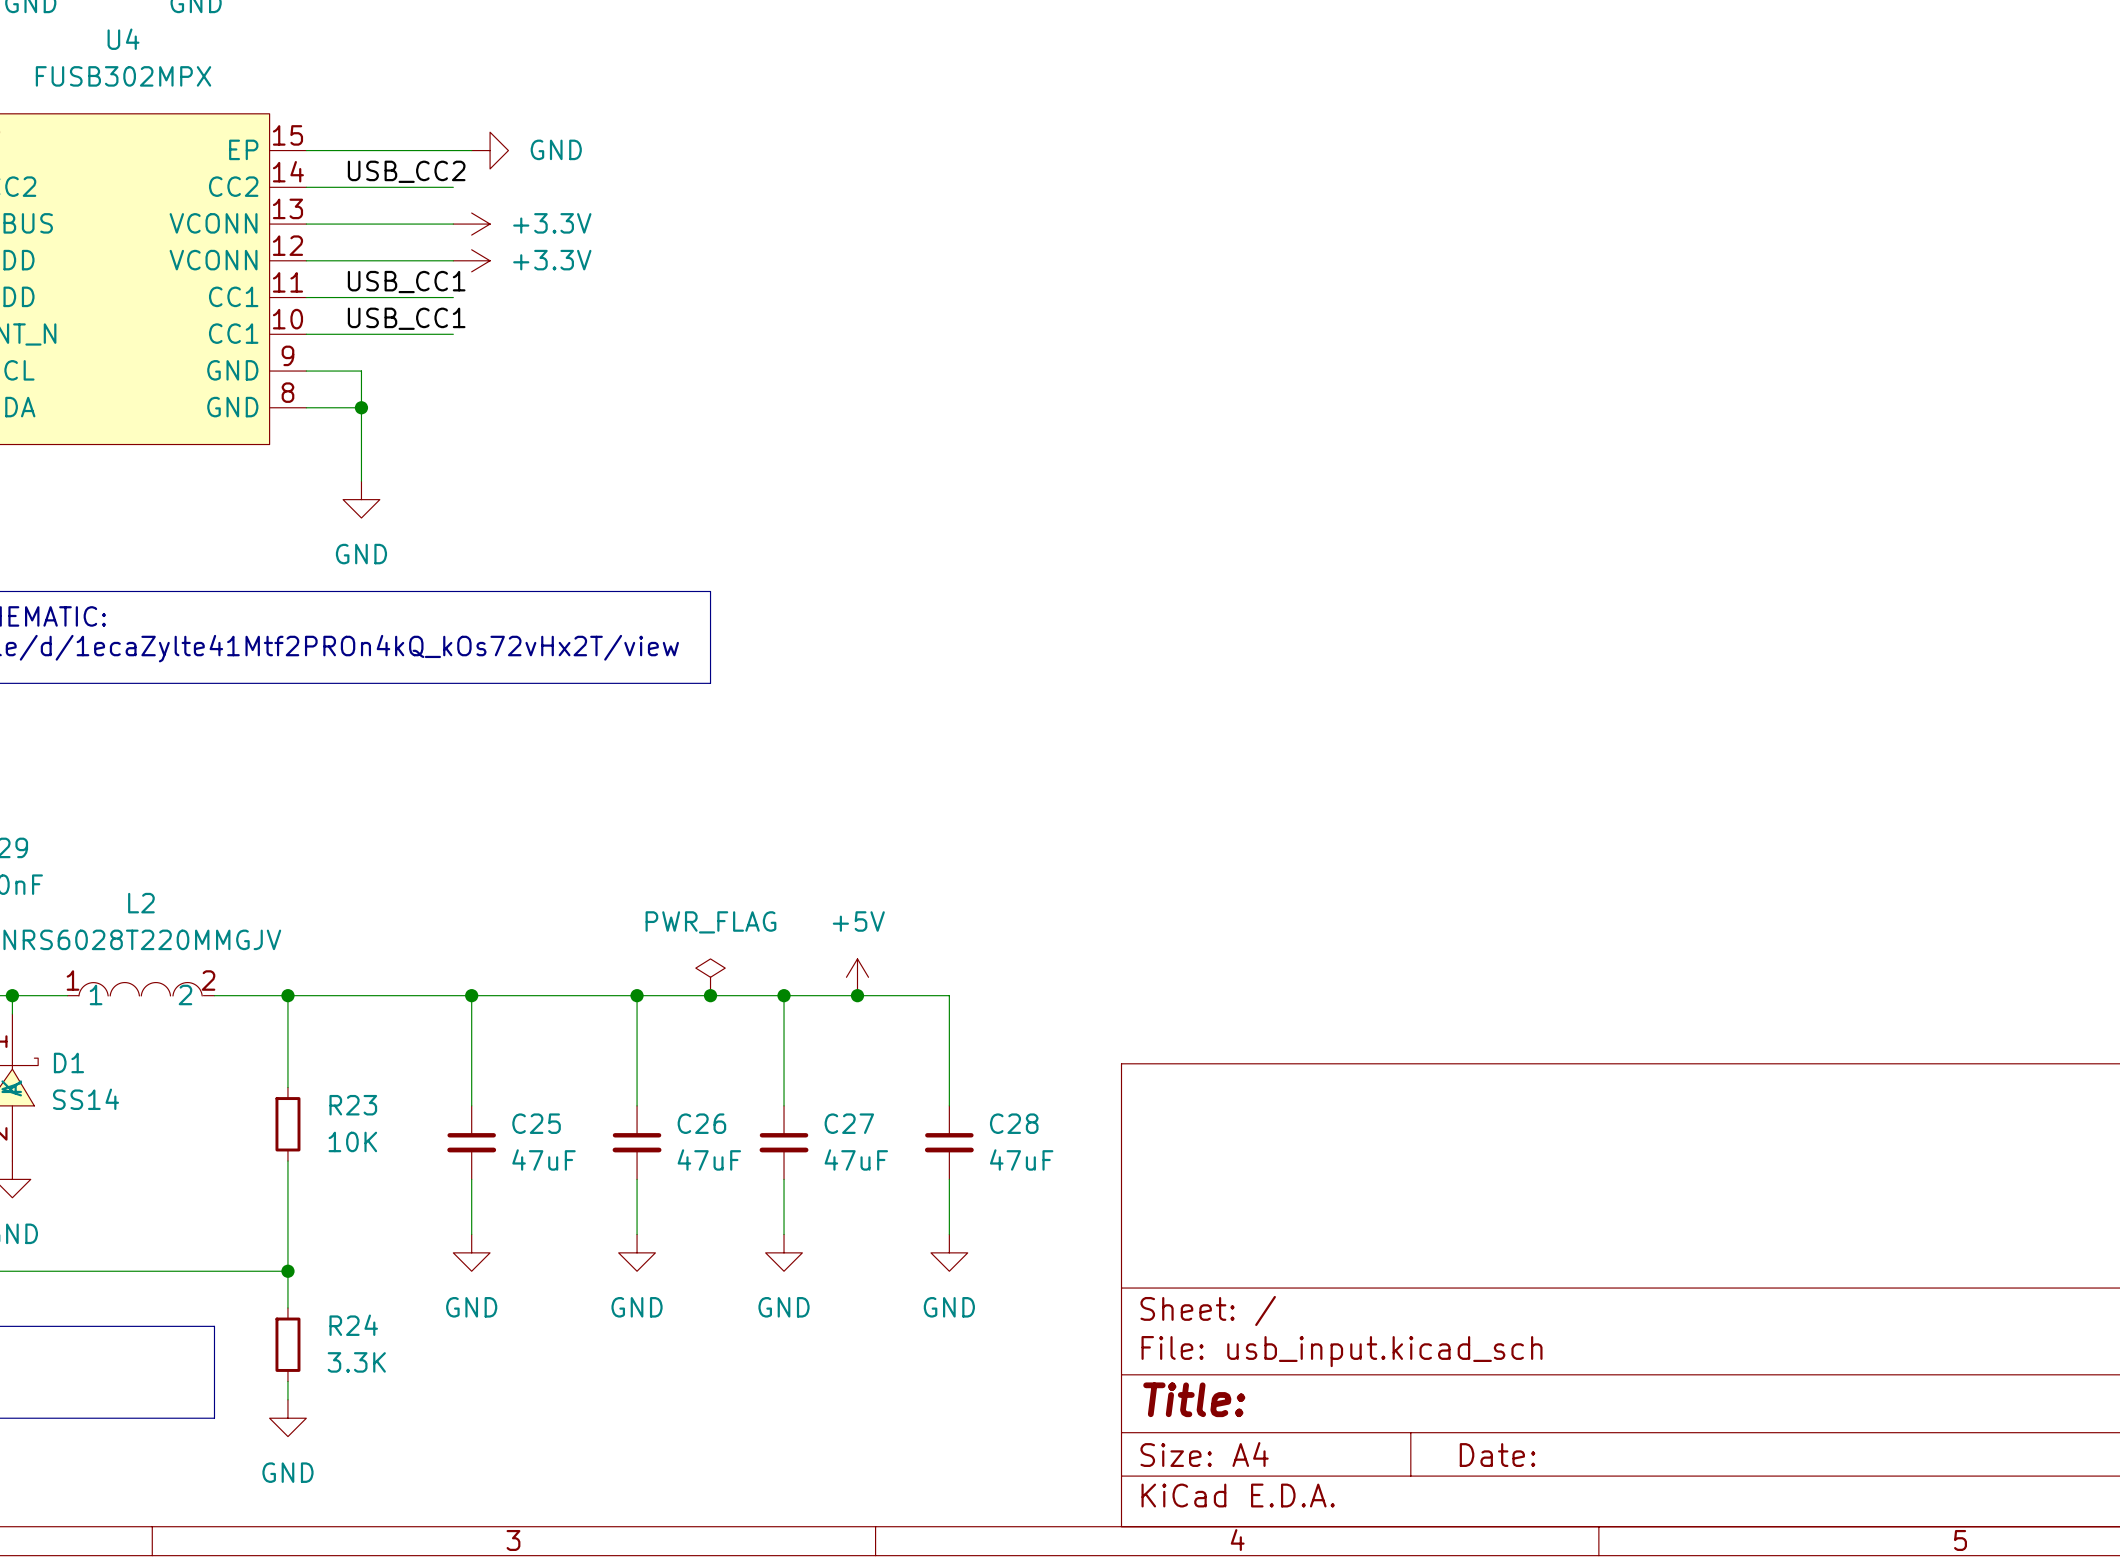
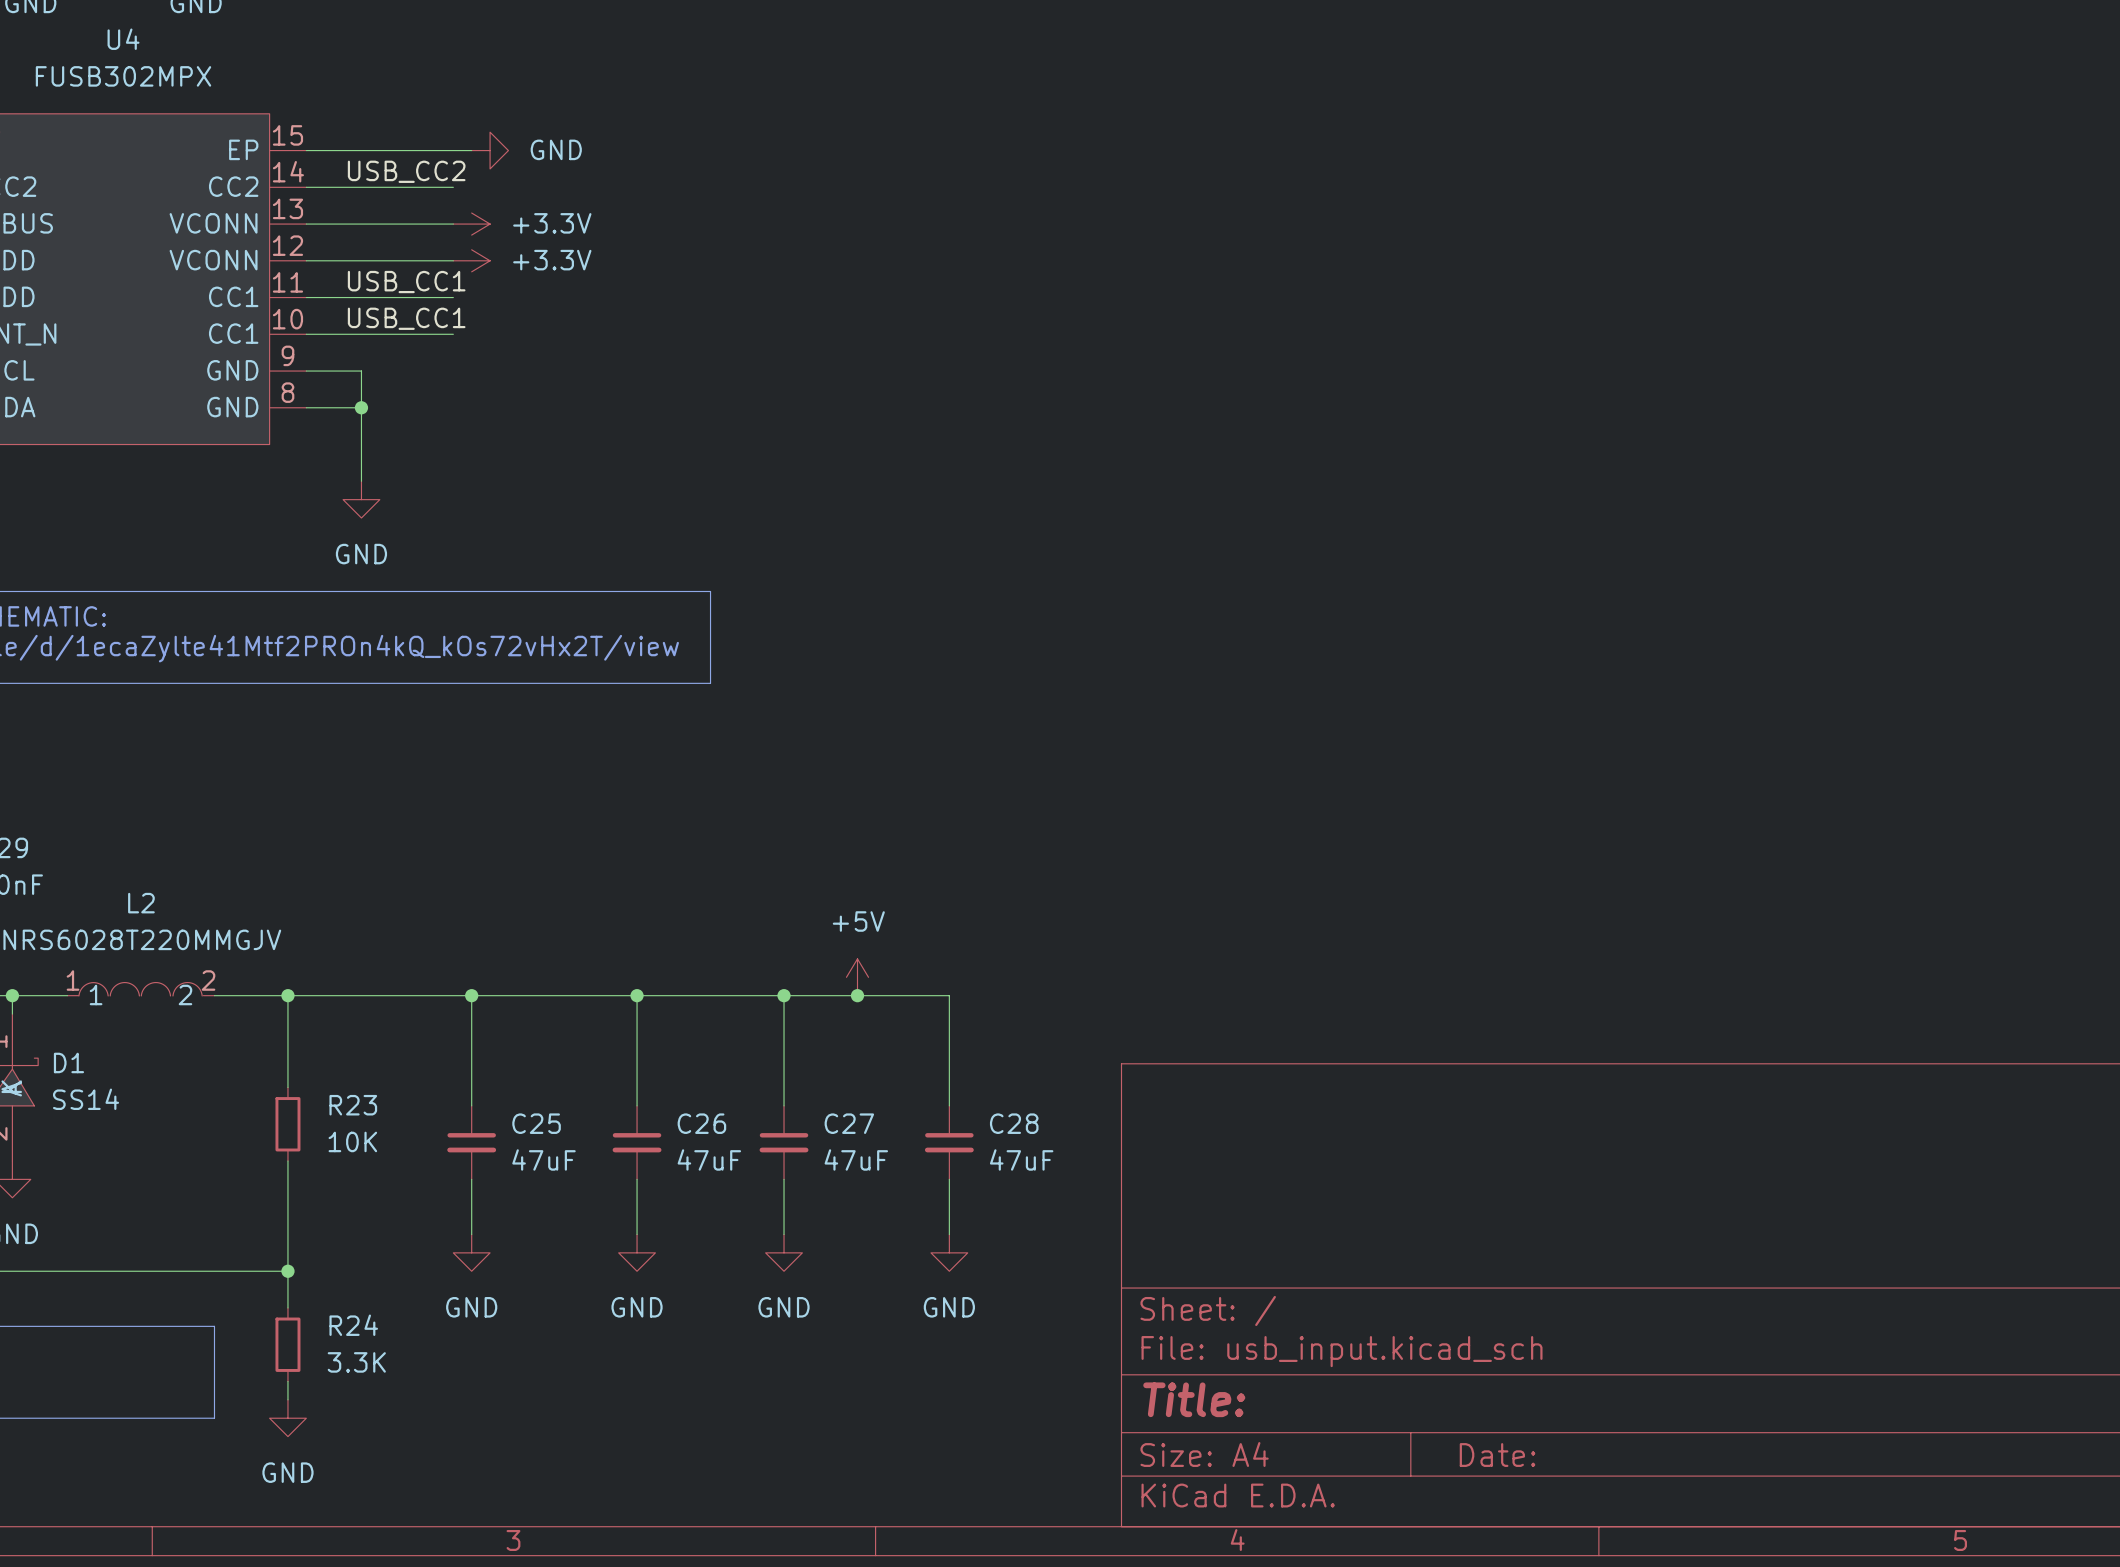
power symbol: PWR_FLAG (710, 977) -> none
junction: (710, 995) -> none

